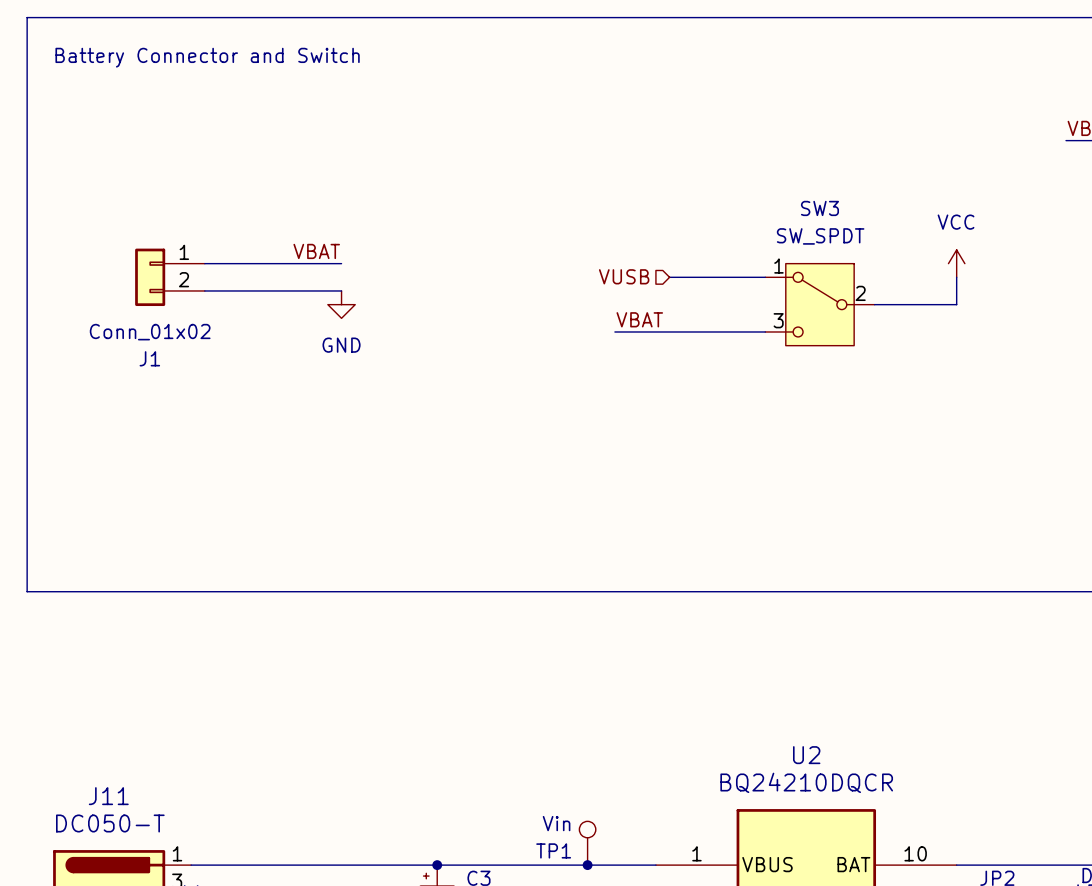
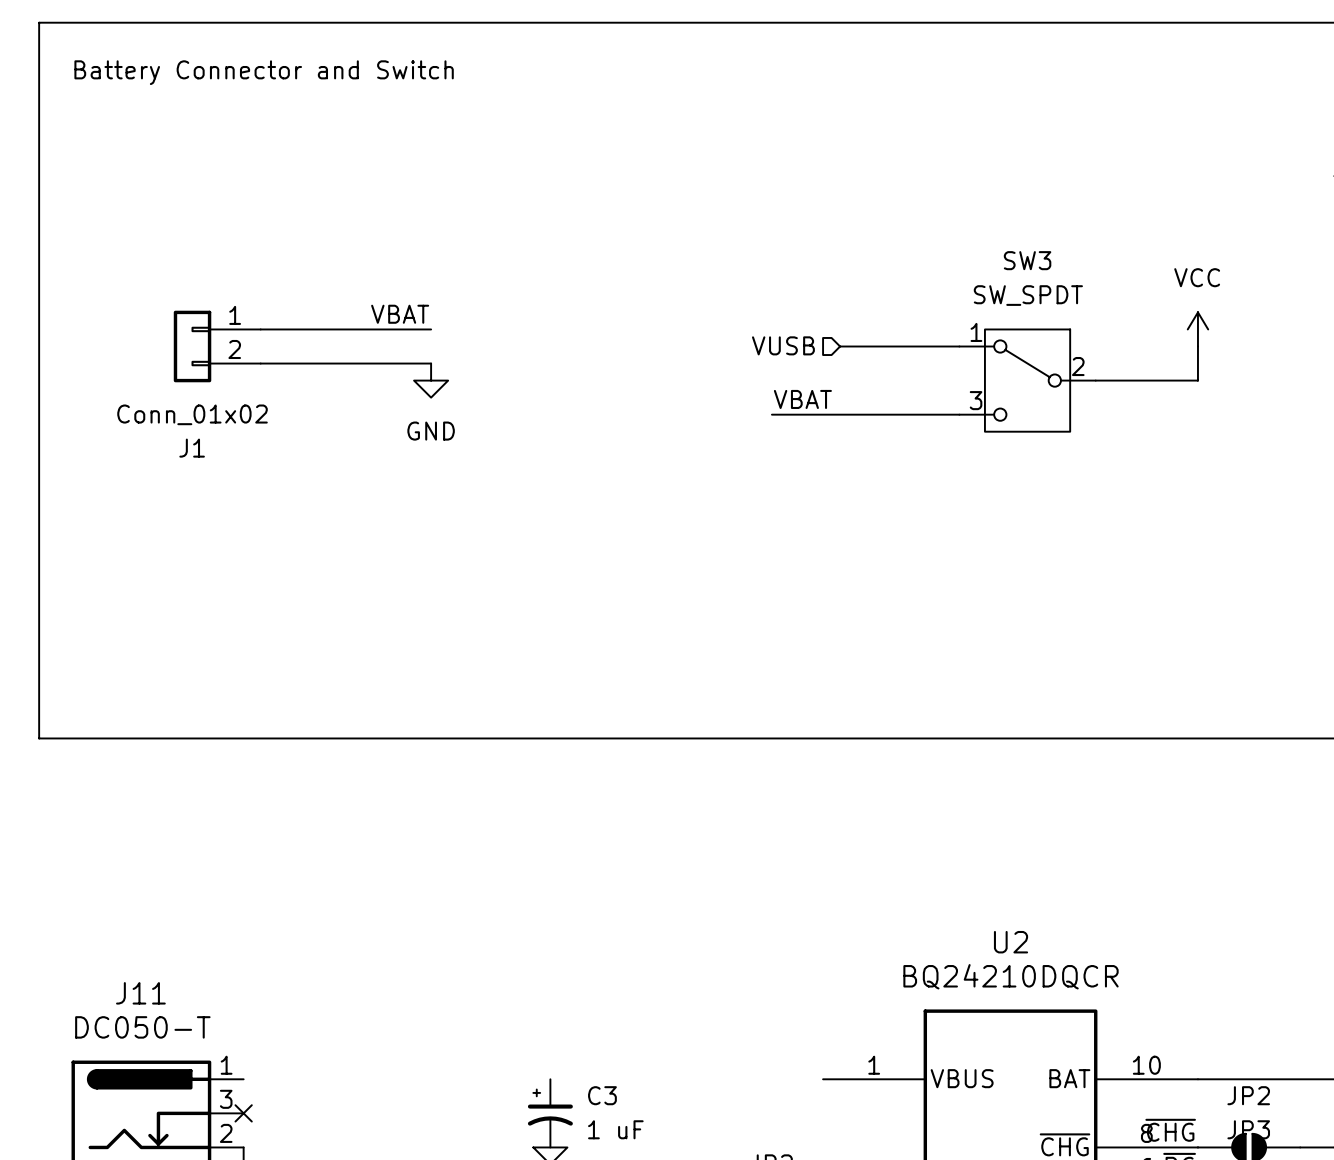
TP1: Vin (587, 843) -> none
wire: (191, 865) (655, 865) -> none
junction: (437, 865) -> none
junction: (587, 865) -> none

